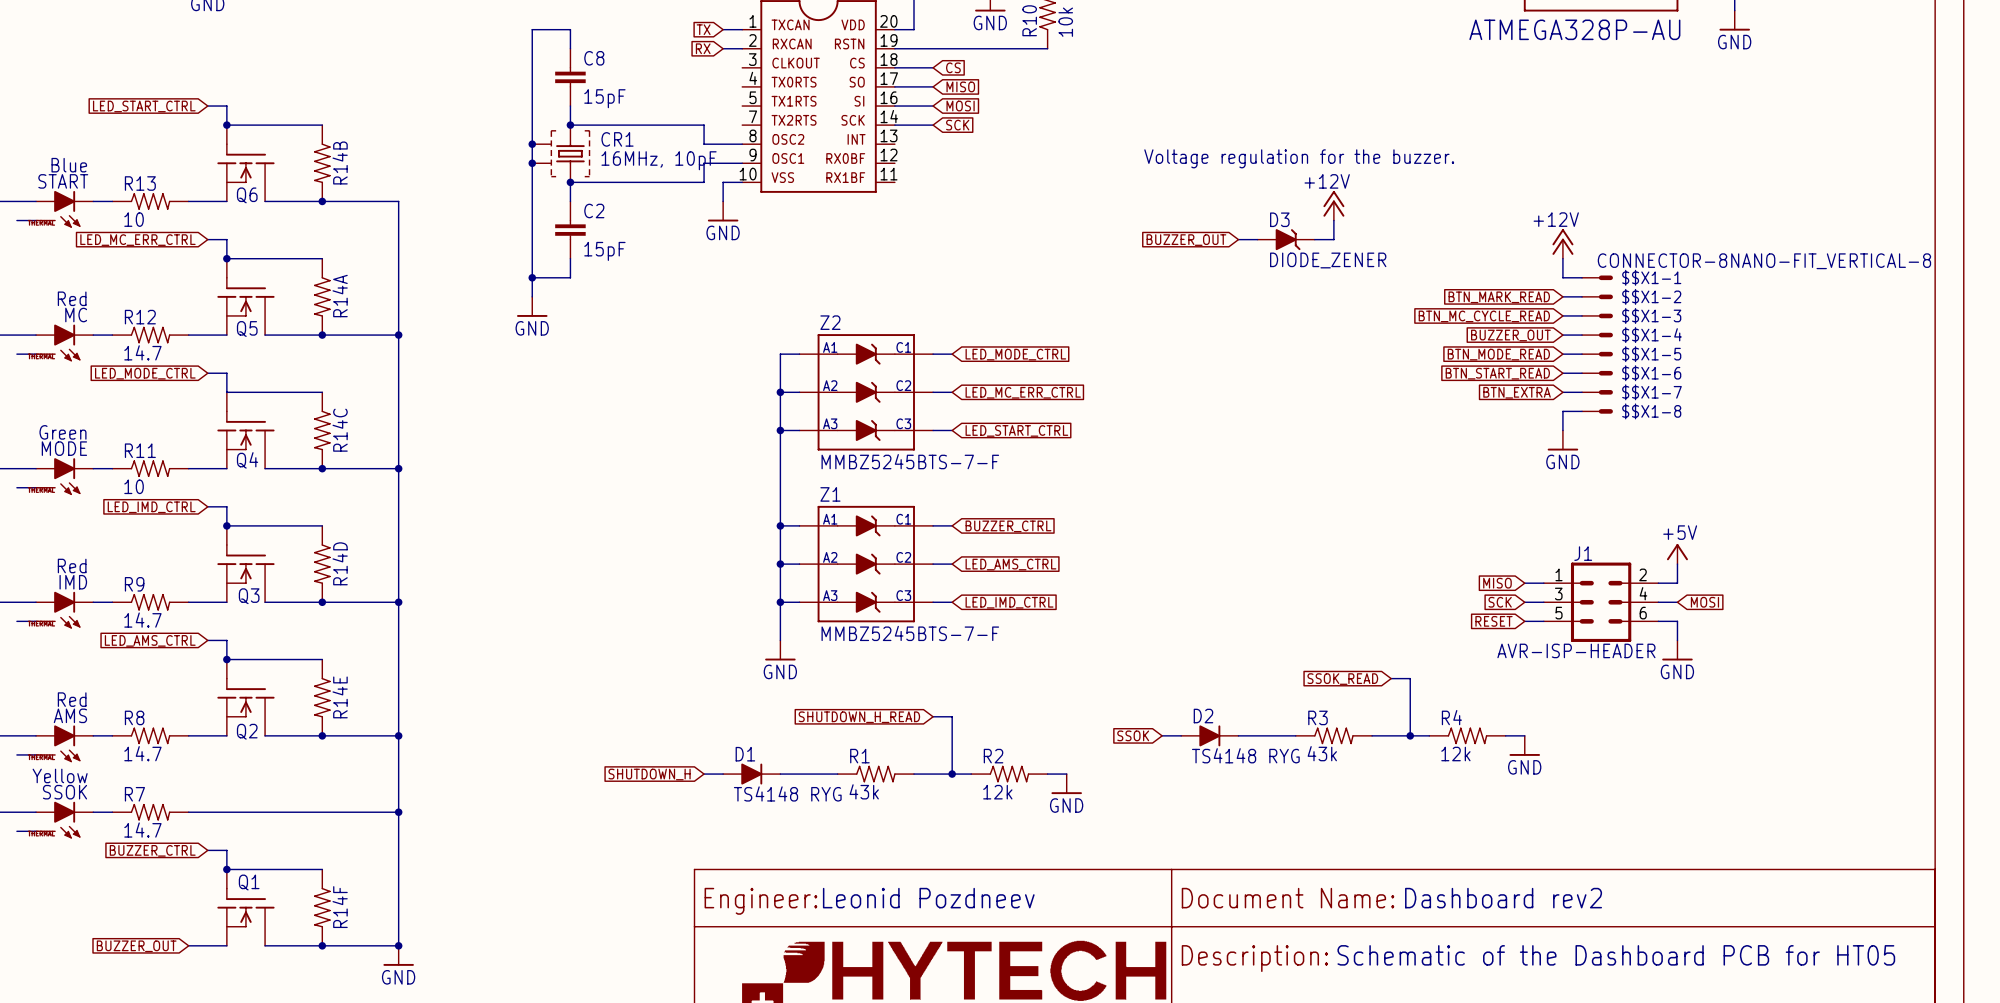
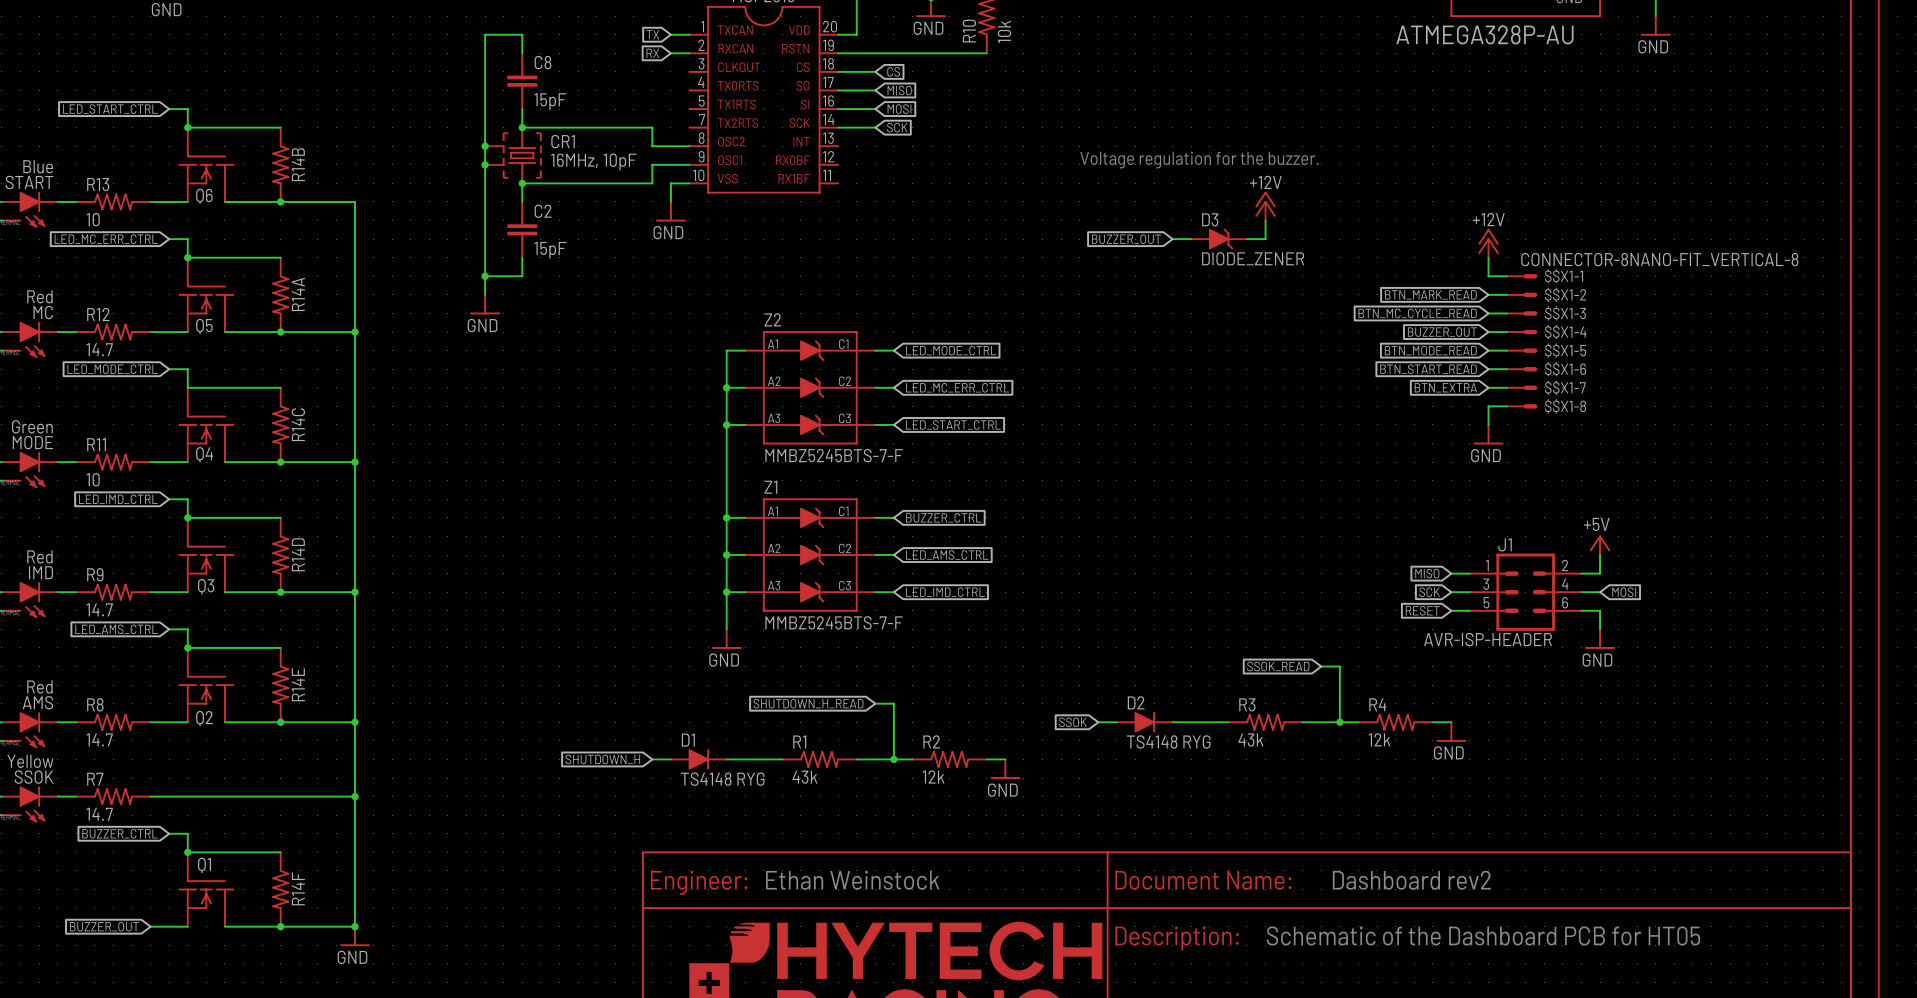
text: Leonid Pozdneev (928, 898) -> Ethan Weinstock (852, 880)

